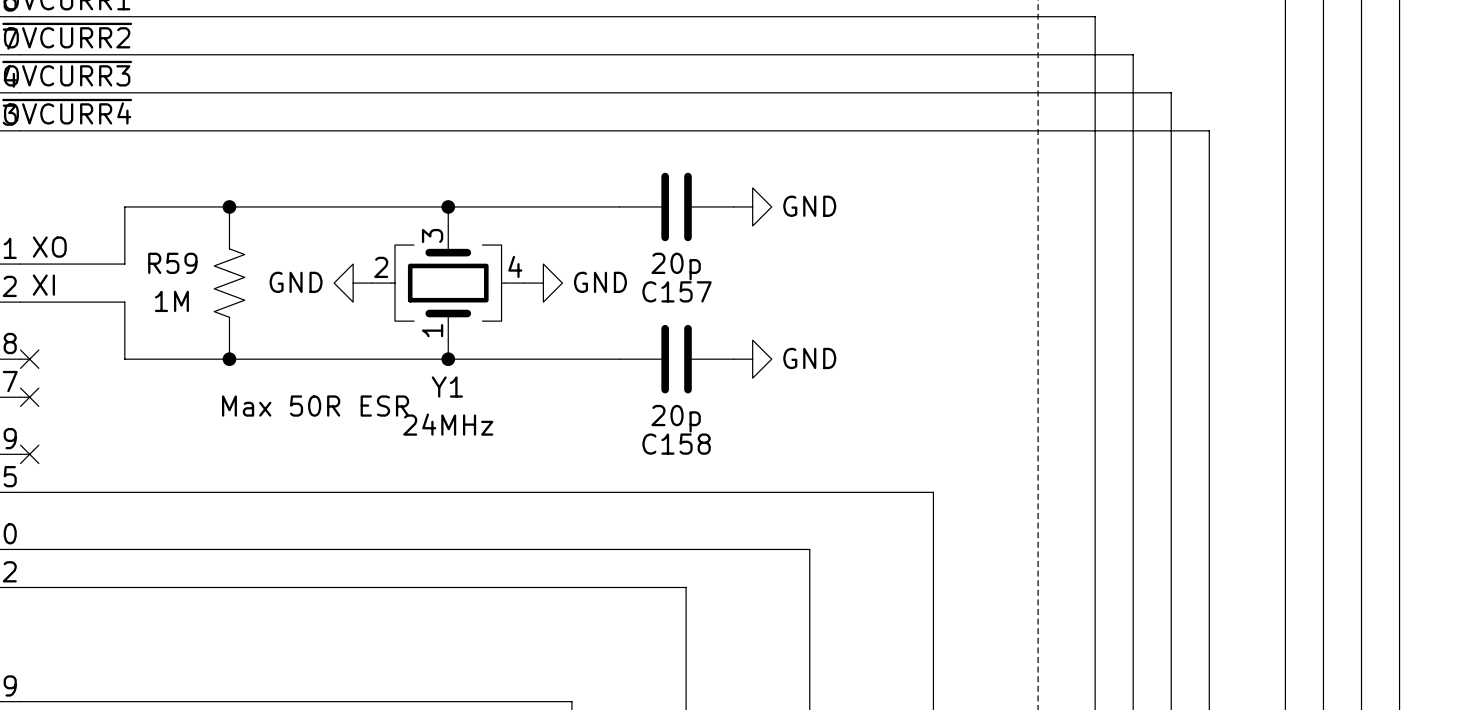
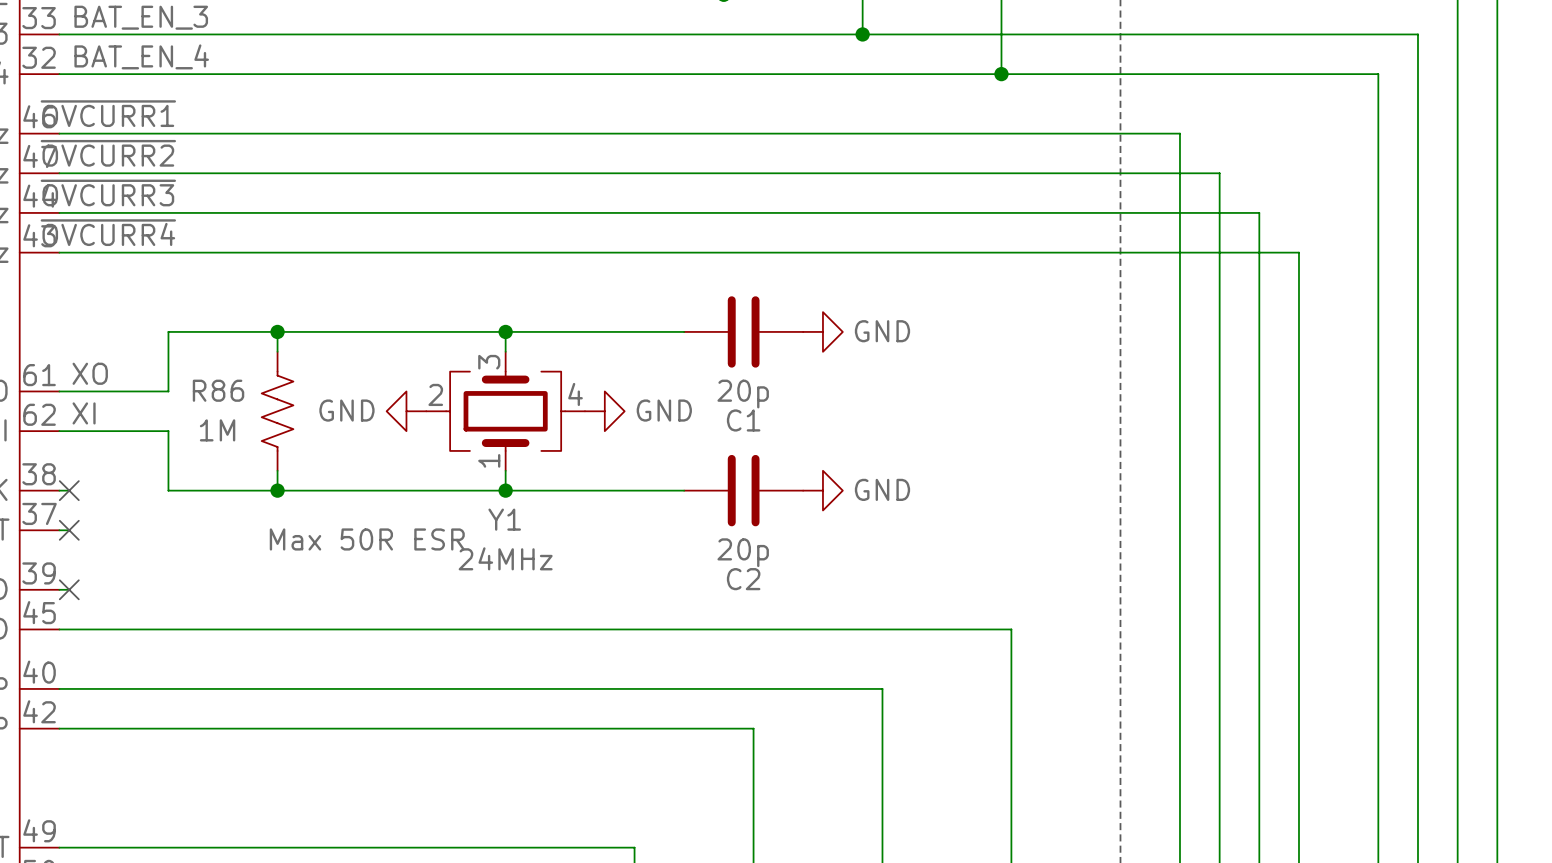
R59 name: R59 (172, 263) -> R86 (218, 390)
C157 name: C157 (677, 291) -> C1 (743, 420)
C158 name: C158 (676, 444) -> C2 (743, 579)

